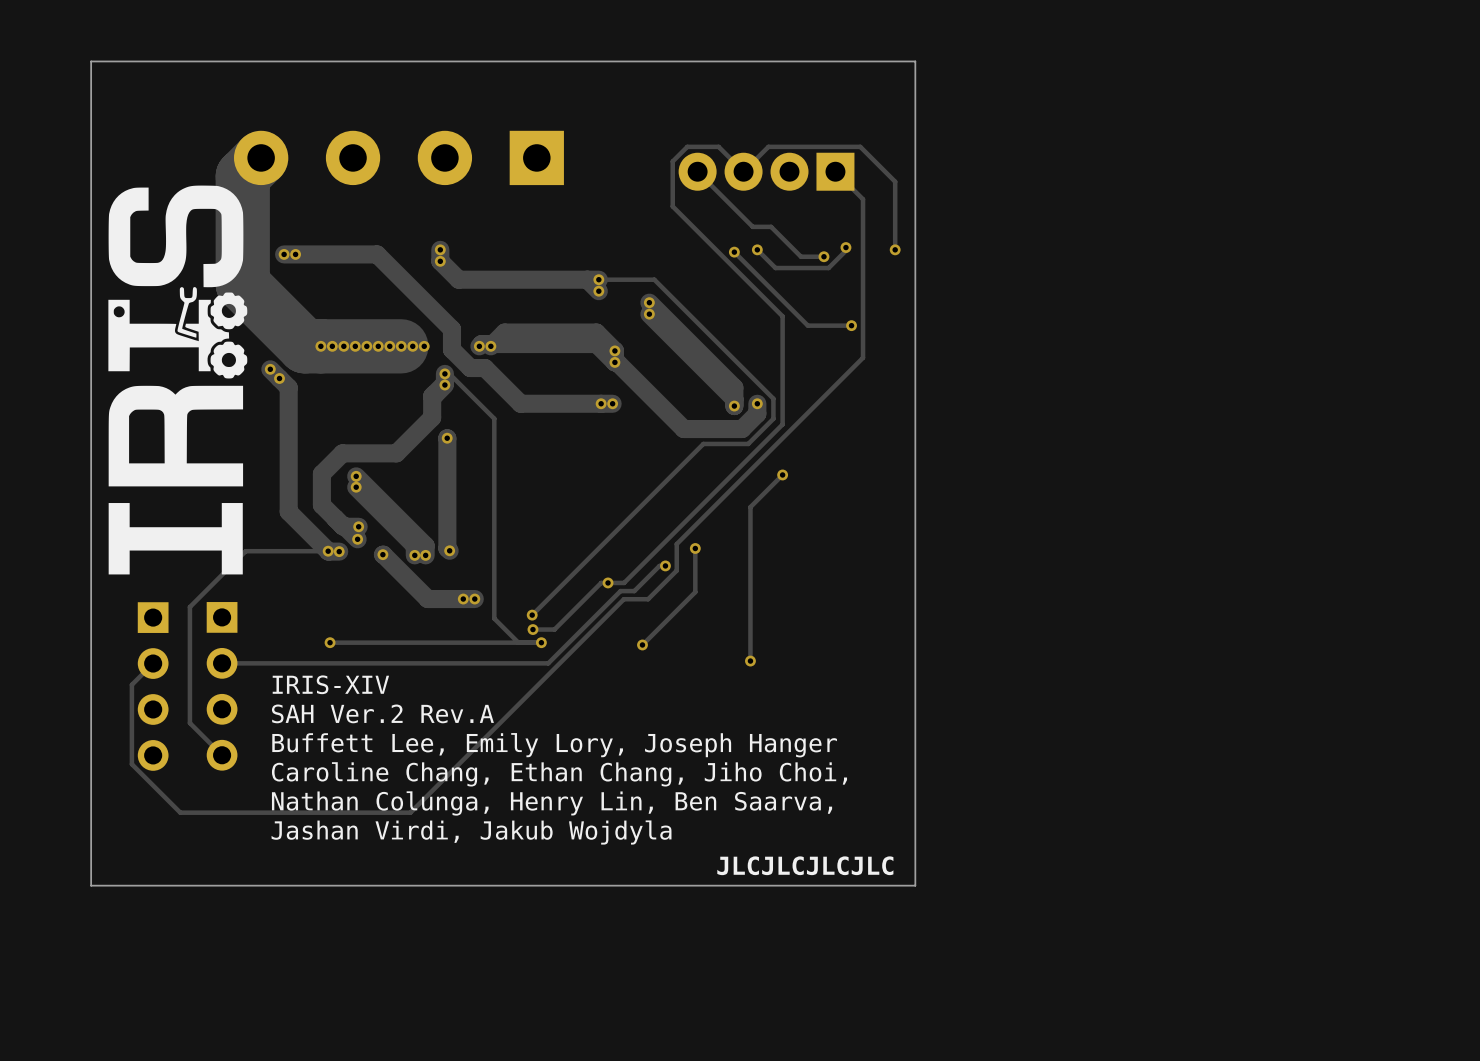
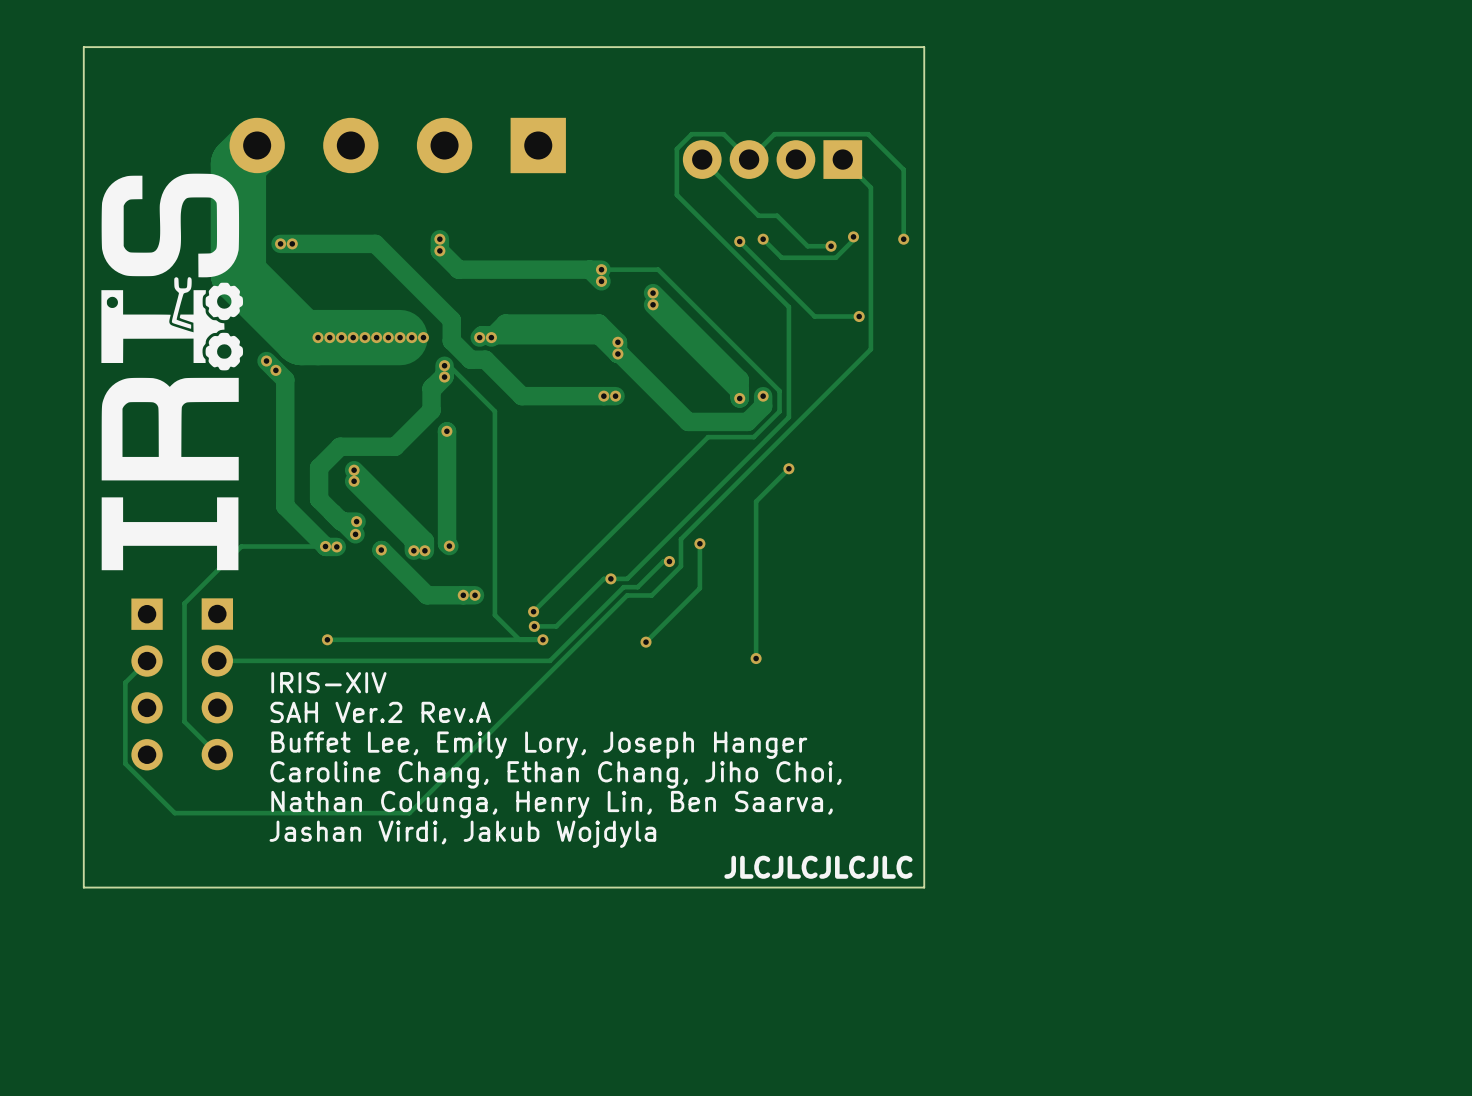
text: Buffett Lee, Emily Lory, Joseph Hanger (554, 745) -> Buffet Lee, Emily Lory, Joseph Hanger (539, 745)

